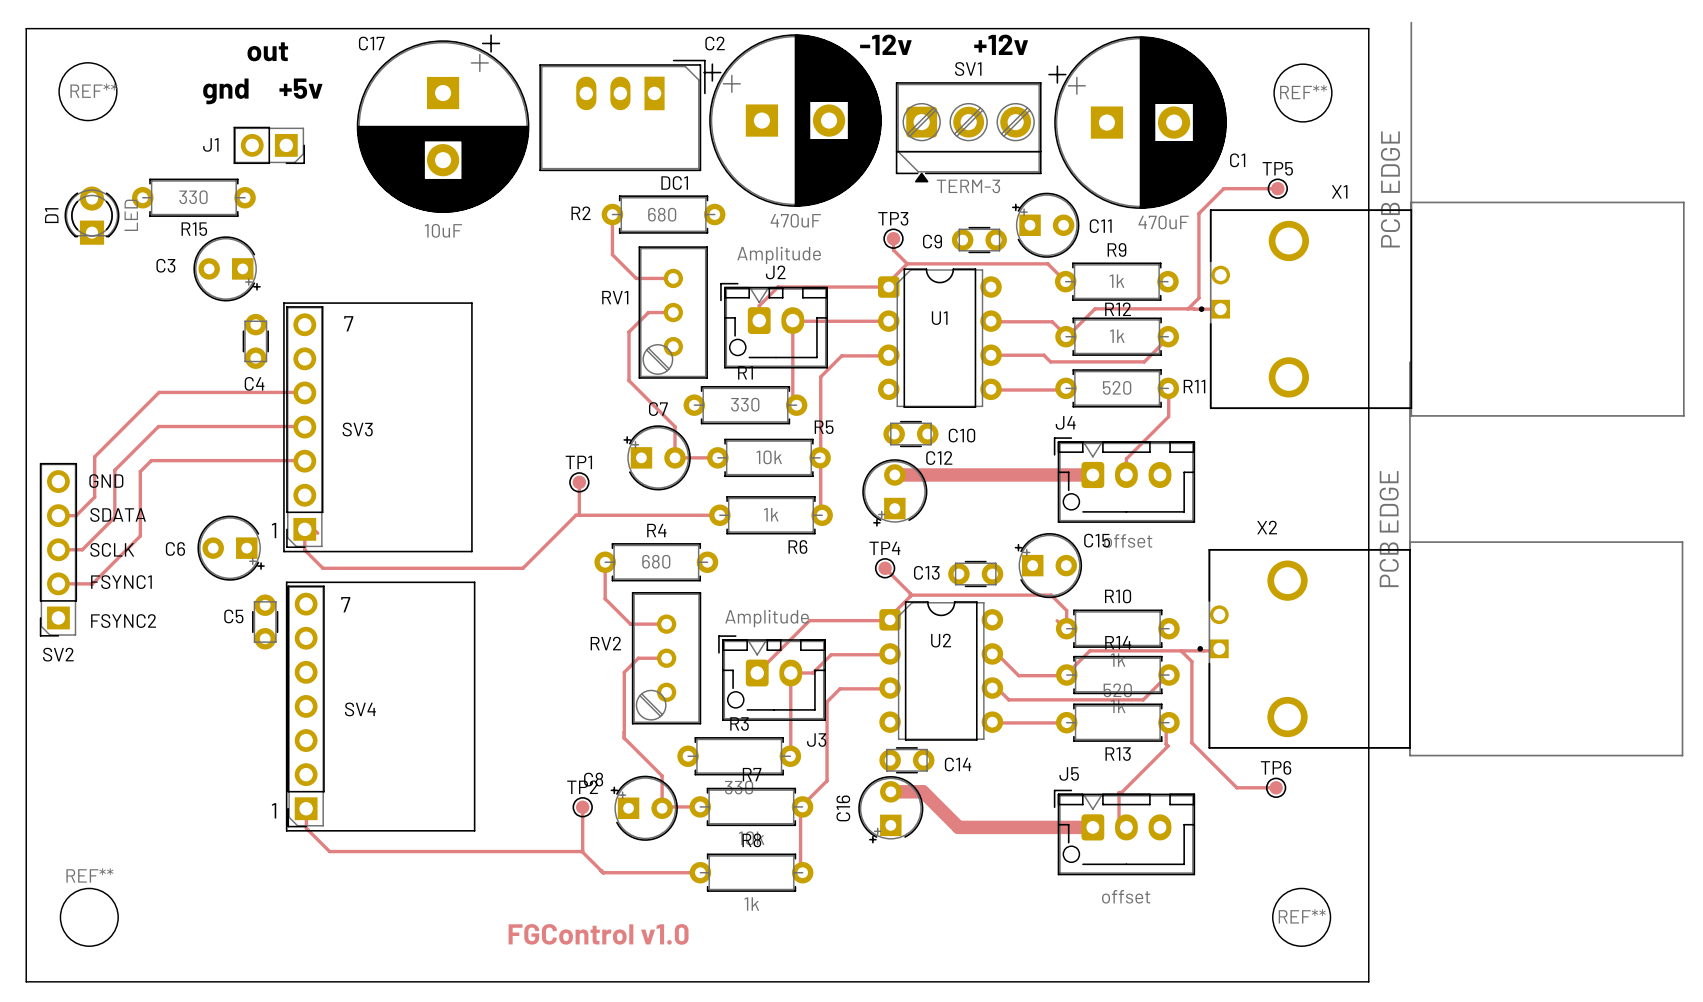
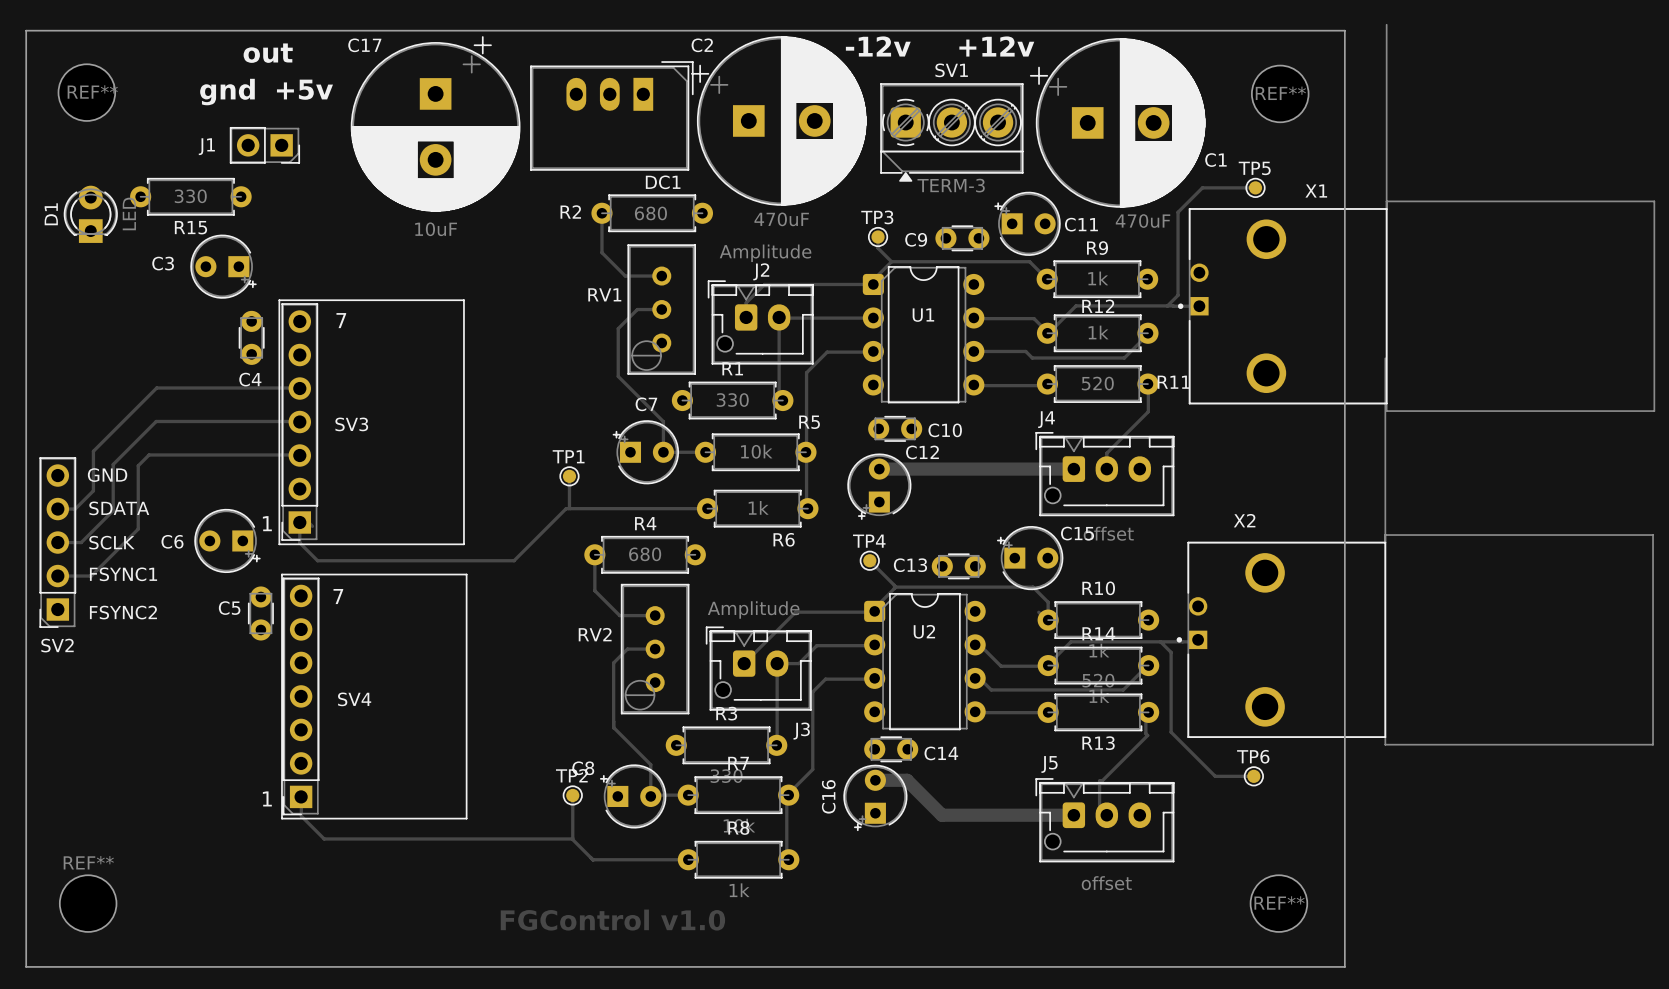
SV1 footprint: [895, 82, 1042, 183] -> [880, 83, 1024, 182]
X1 text: PCB EDGE (1390, 189) -> none
RV1 footprint: [638, 246, 708, 379] -> [627, 244, 696, 375]
X2 text: PCB EDGE (1389, 529) -> none
RV2 footprint: [631, 591, 702, 725] -> [620, 583, 690, 715]

